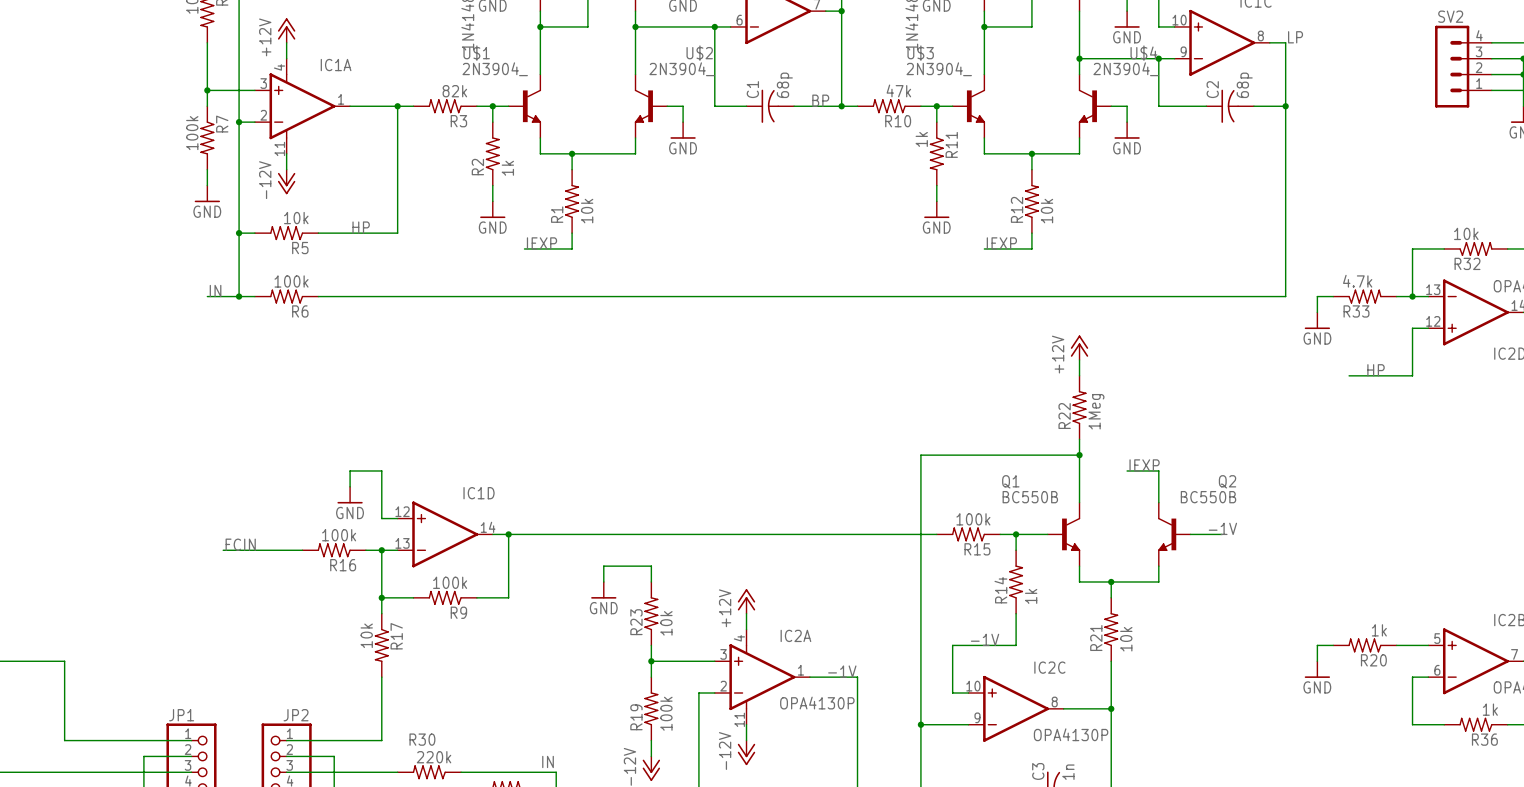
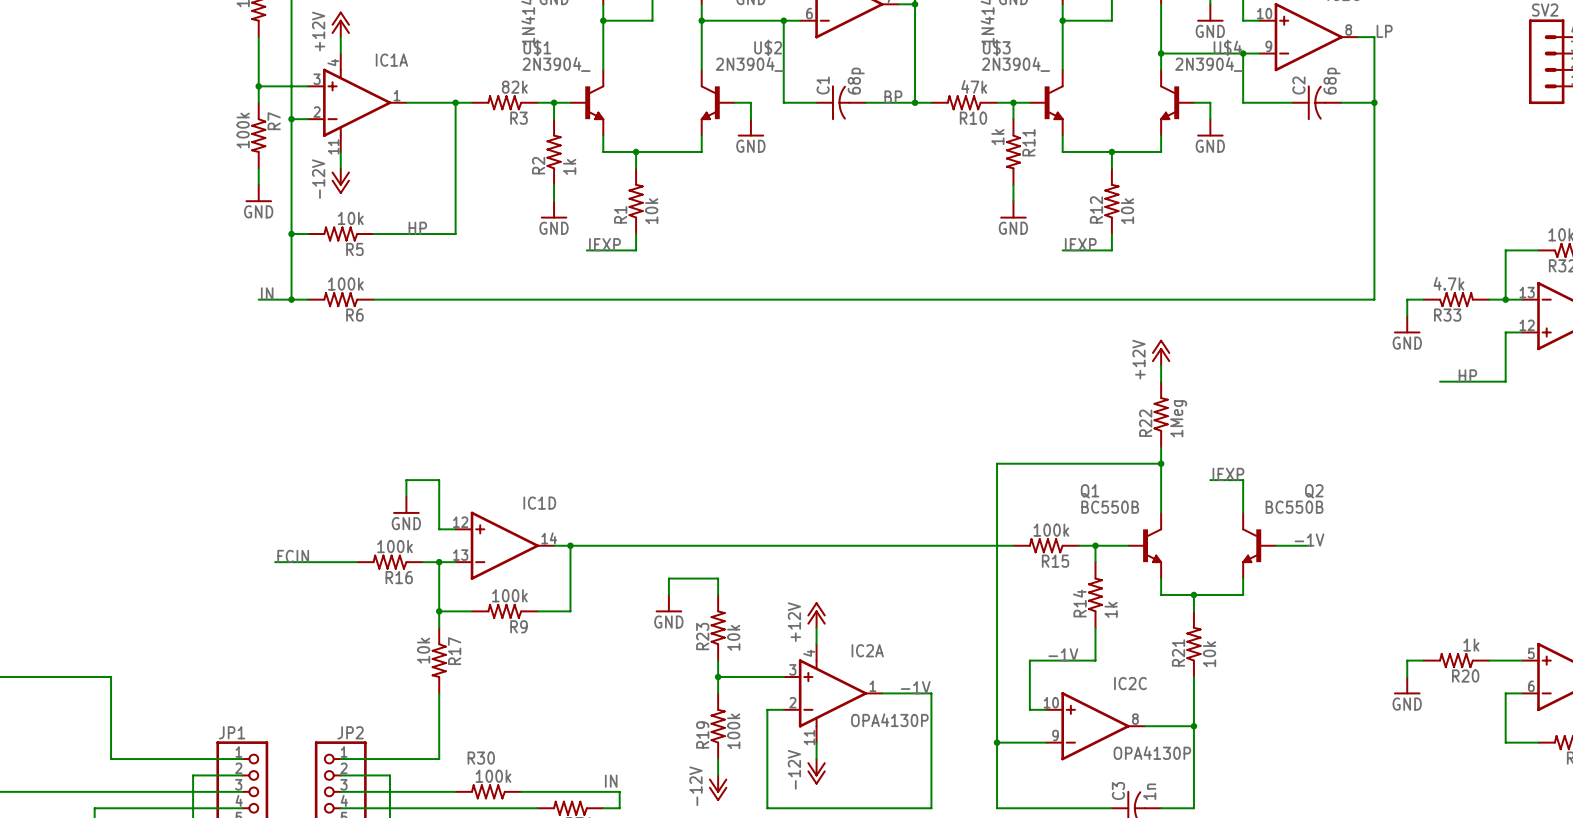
R30 value: 220k (434, 757) -> 100k (493, 776)

